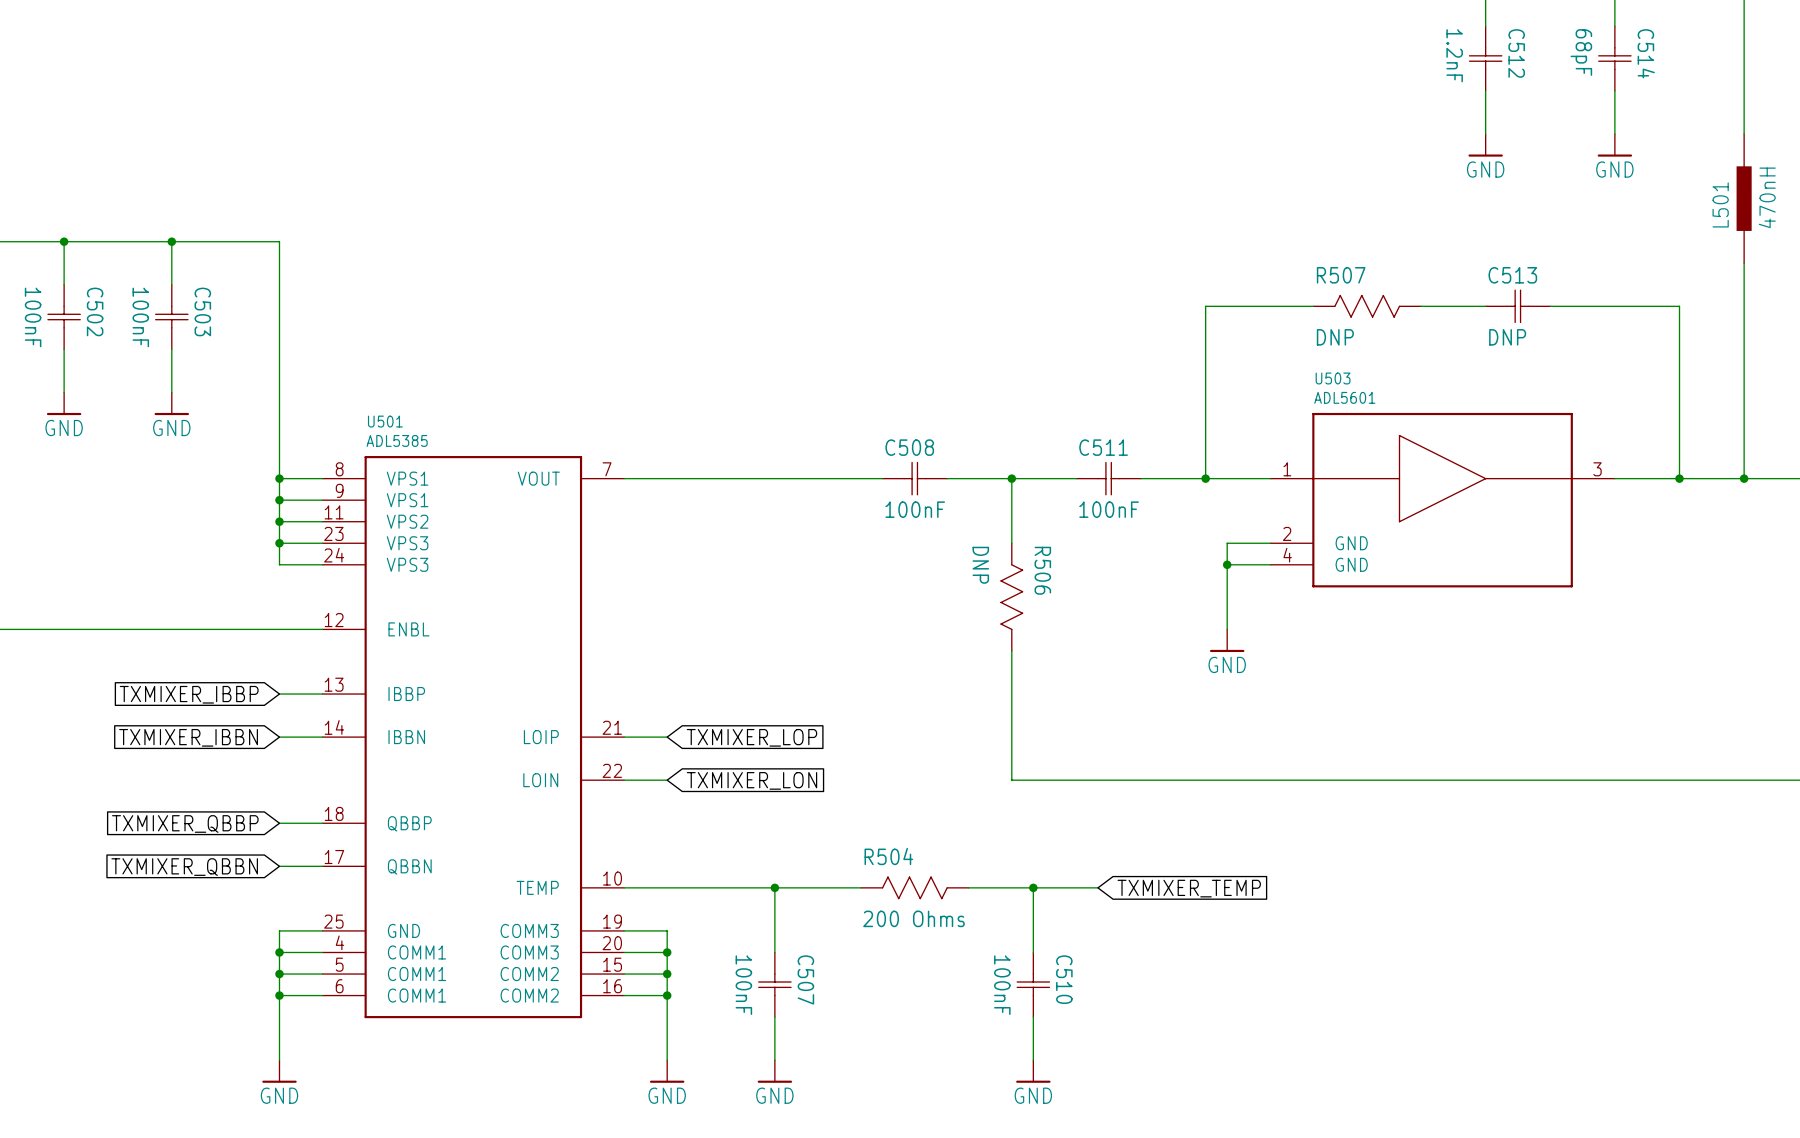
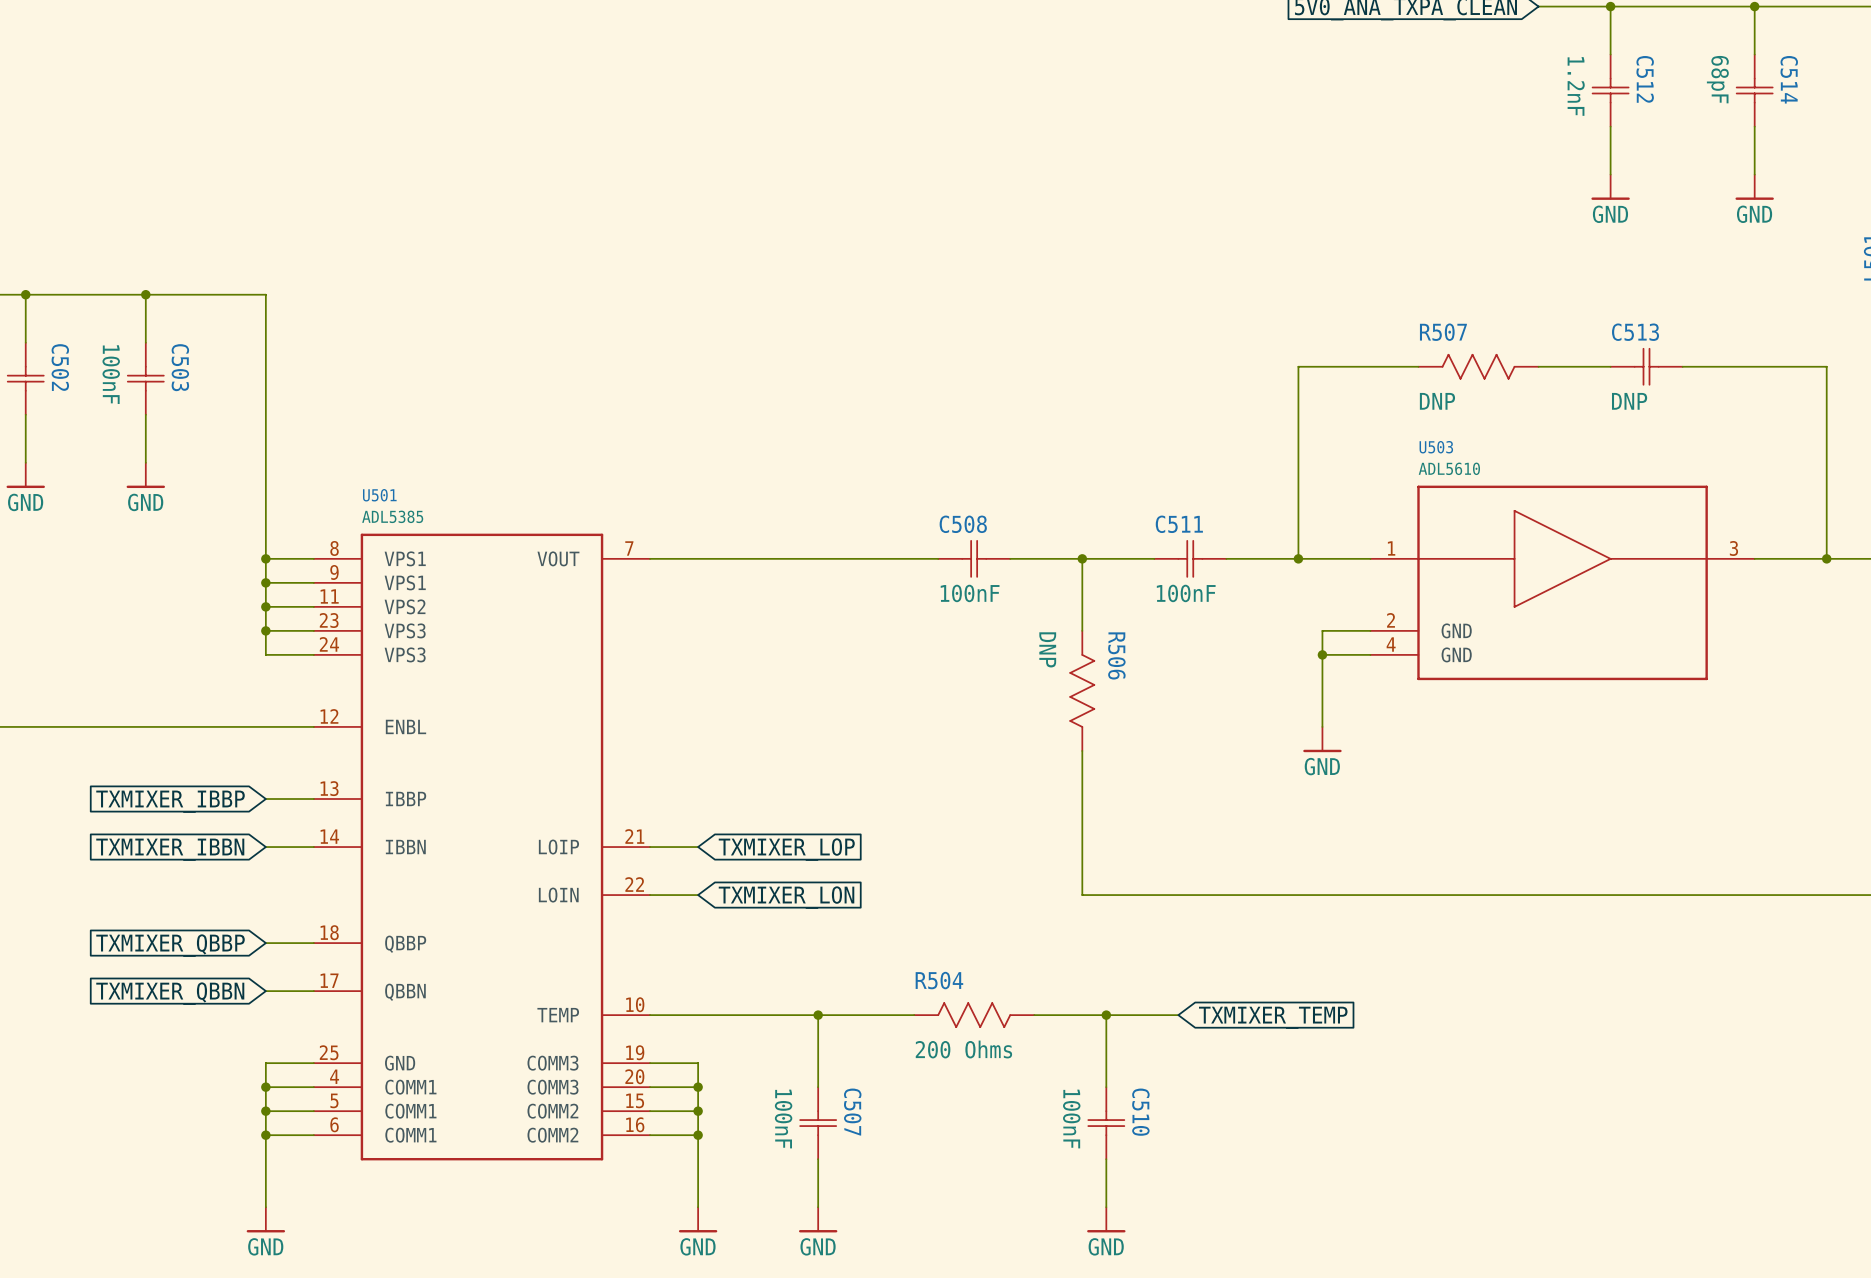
U503 value: ADL5601 (1344, 397) -> ADL5610 (1449, 468)

